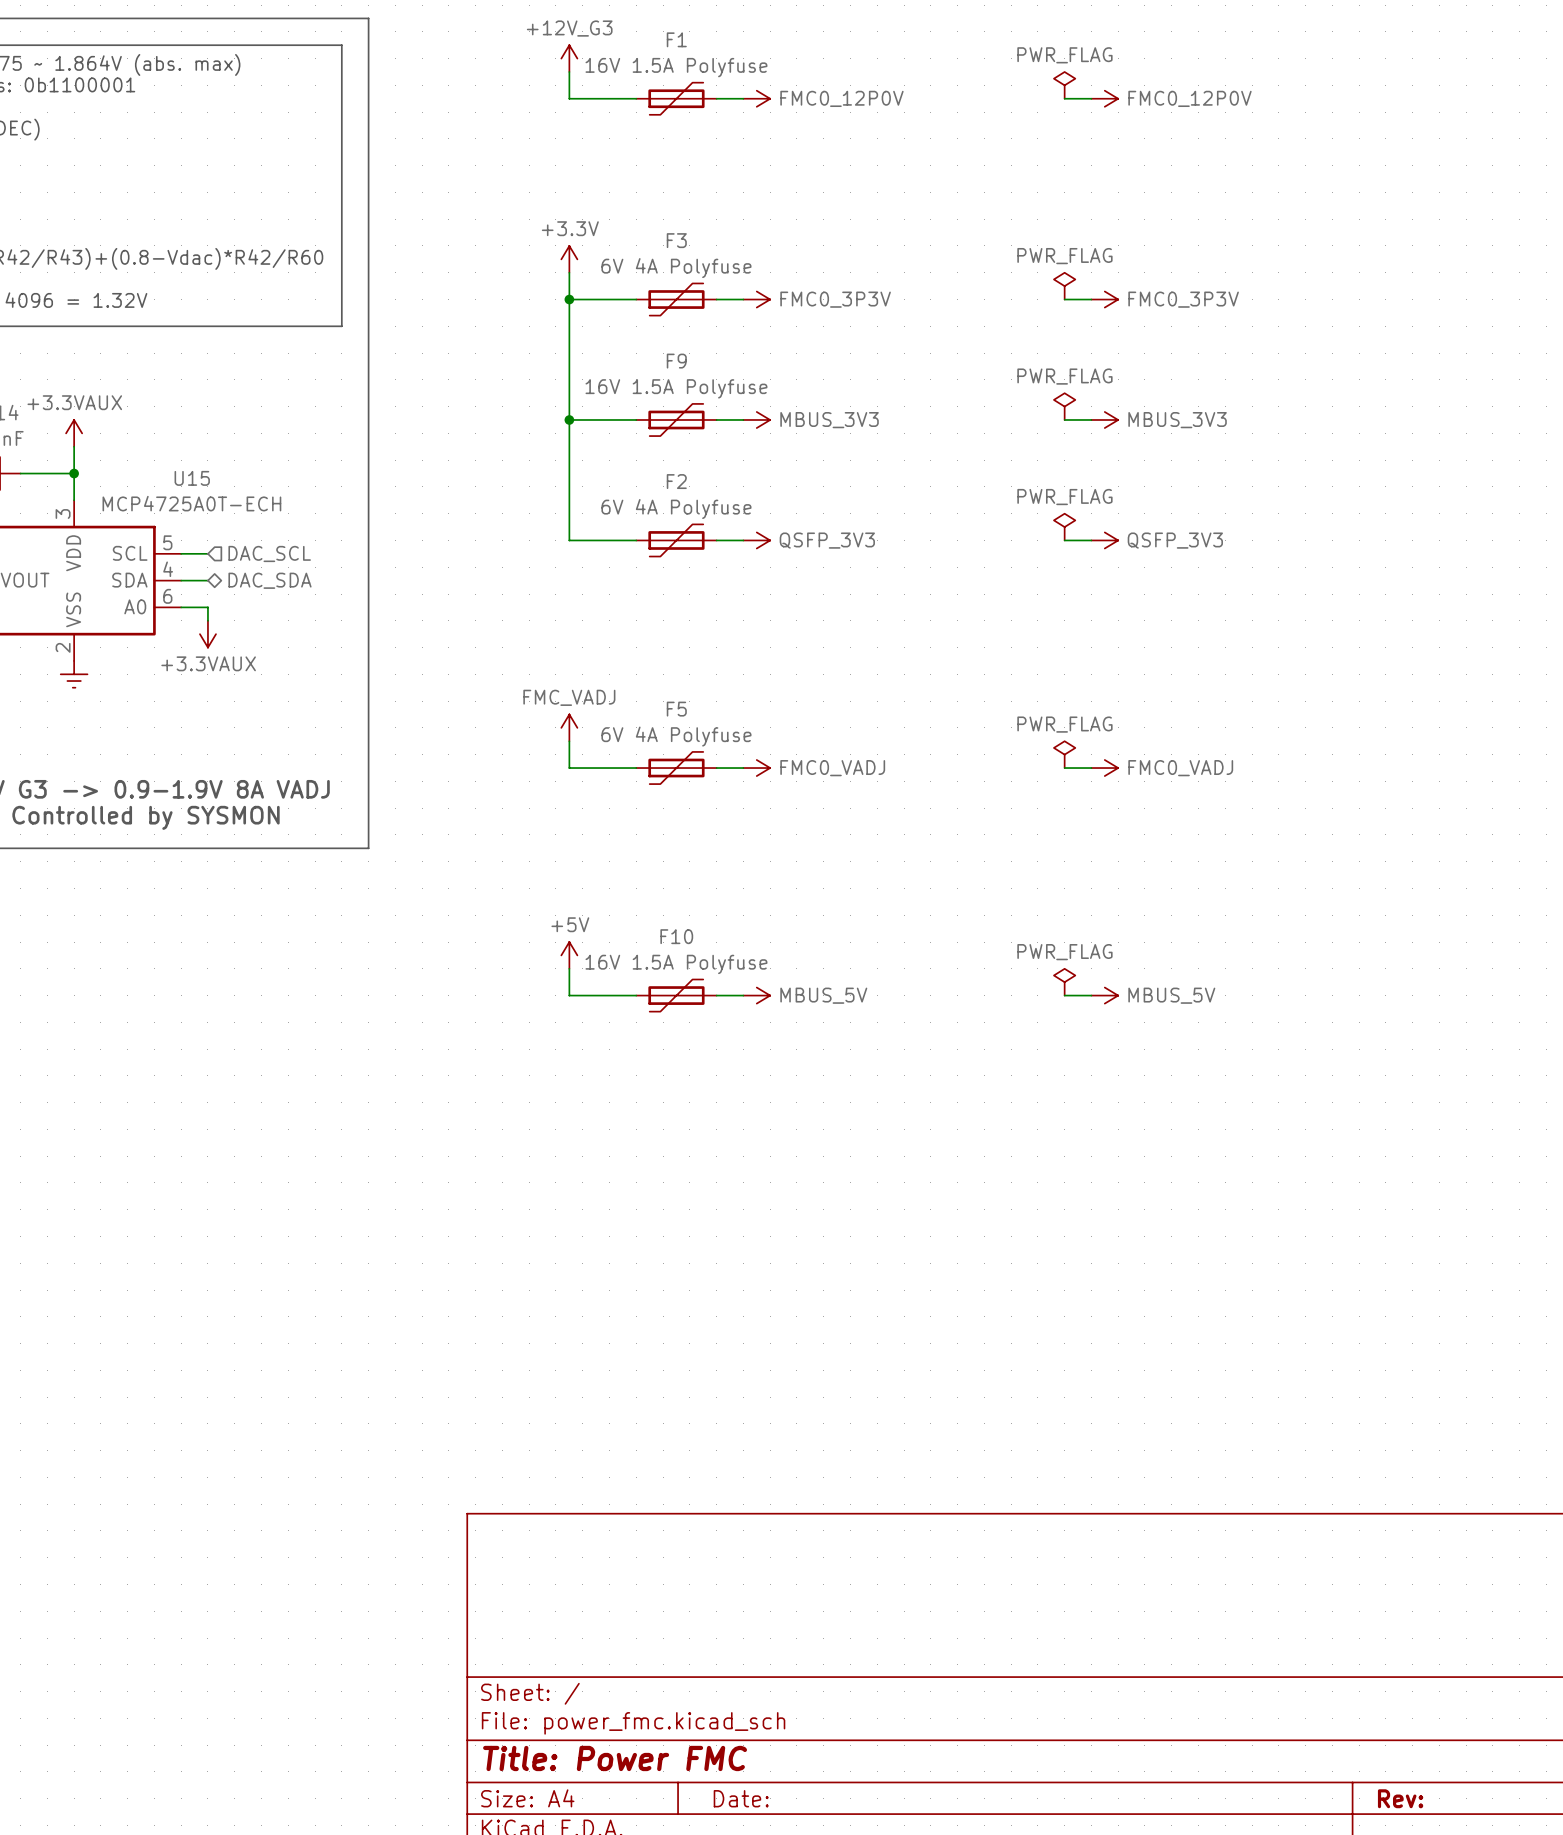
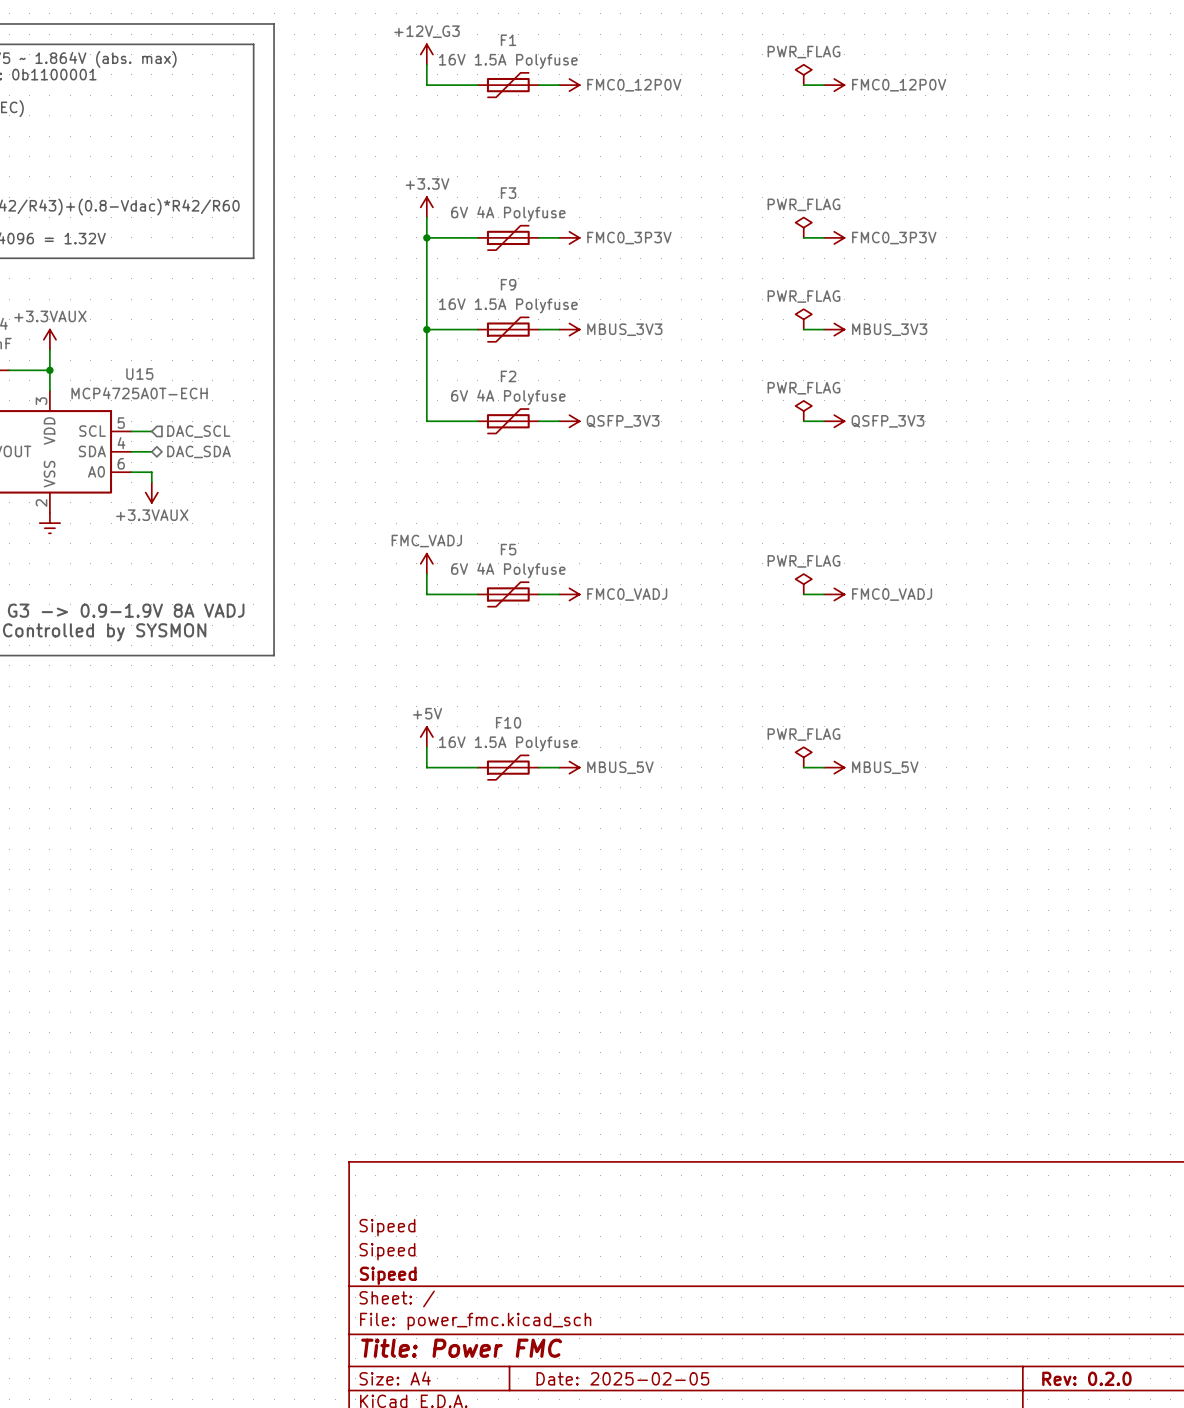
title block: none -> Sipeed (387, 1227)
title block: none -> Sipeed (387, 1251)
title block: none -> Sipeed (388, 1275)
title block: Date: (741, 1798) -> Date: 2025-02-05 (622, 1378)
title block: Rev: (1400, 1798) -> Rev: 0.2.0 (1086, 1378)

